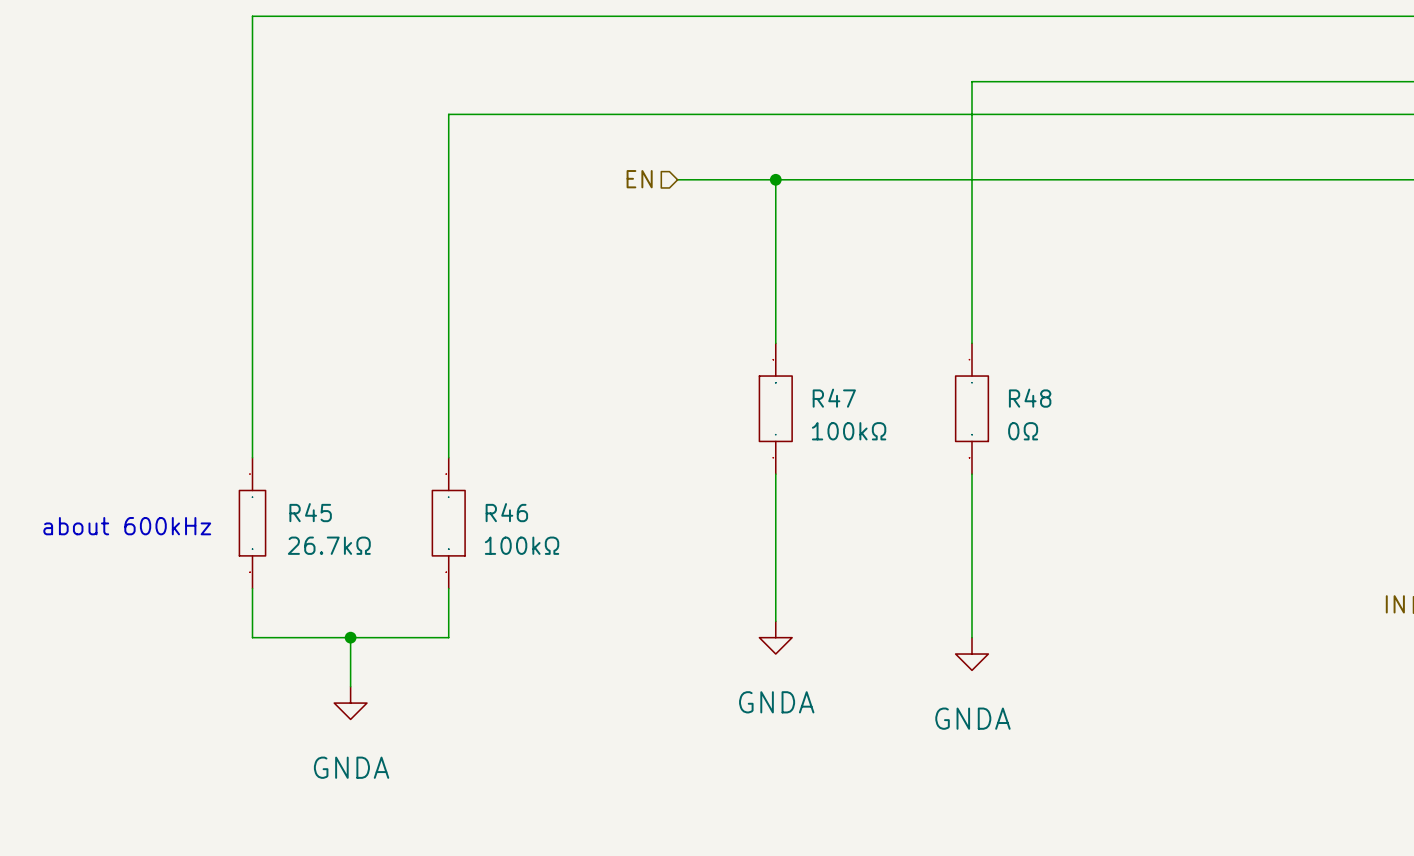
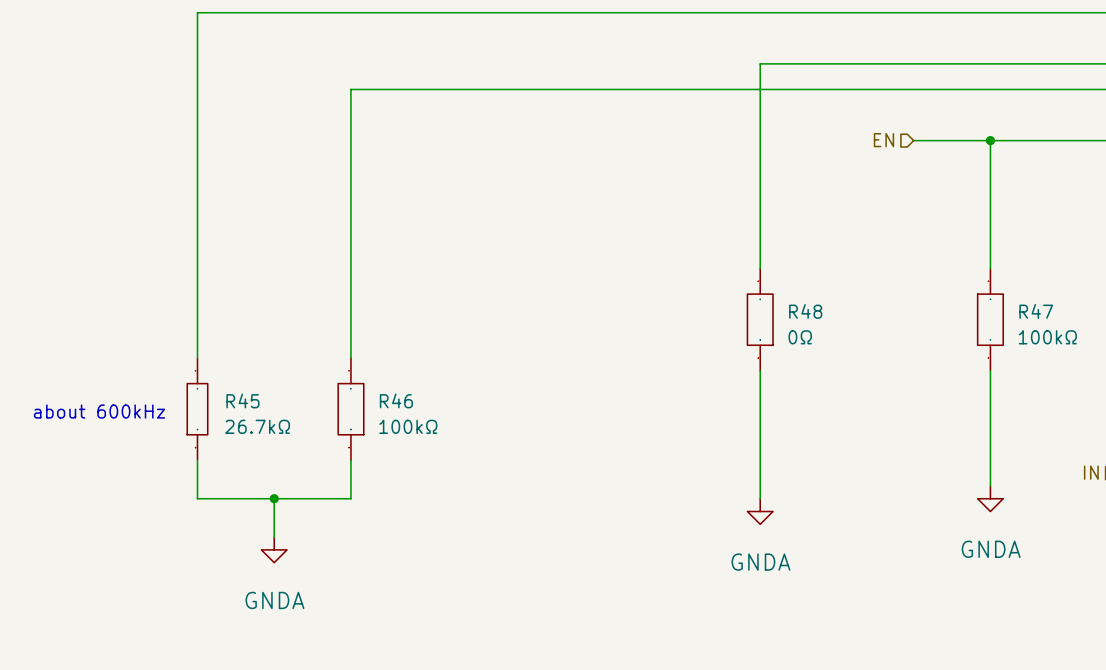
hierarchical label: EN (639, 179) -> none
wire: (677, 179) (1168, 179) -> none
wire: (775, 179) (775, 343) -> none
junction: (775, 179) -> none
hierarchical label: none -> EN (883, 140)
wire: none -> (990, 140) (990, 268)
junction: none -> (990, 140)
R47 position: (775, 408) -> (990, 319)
wire: (775, 474) (775, 621) -> none
wire: none -> (990, 370) (990, 485)
power symbol: GNDA (775, 637) -> none
power symbol: none -> GNDA (990, 498)

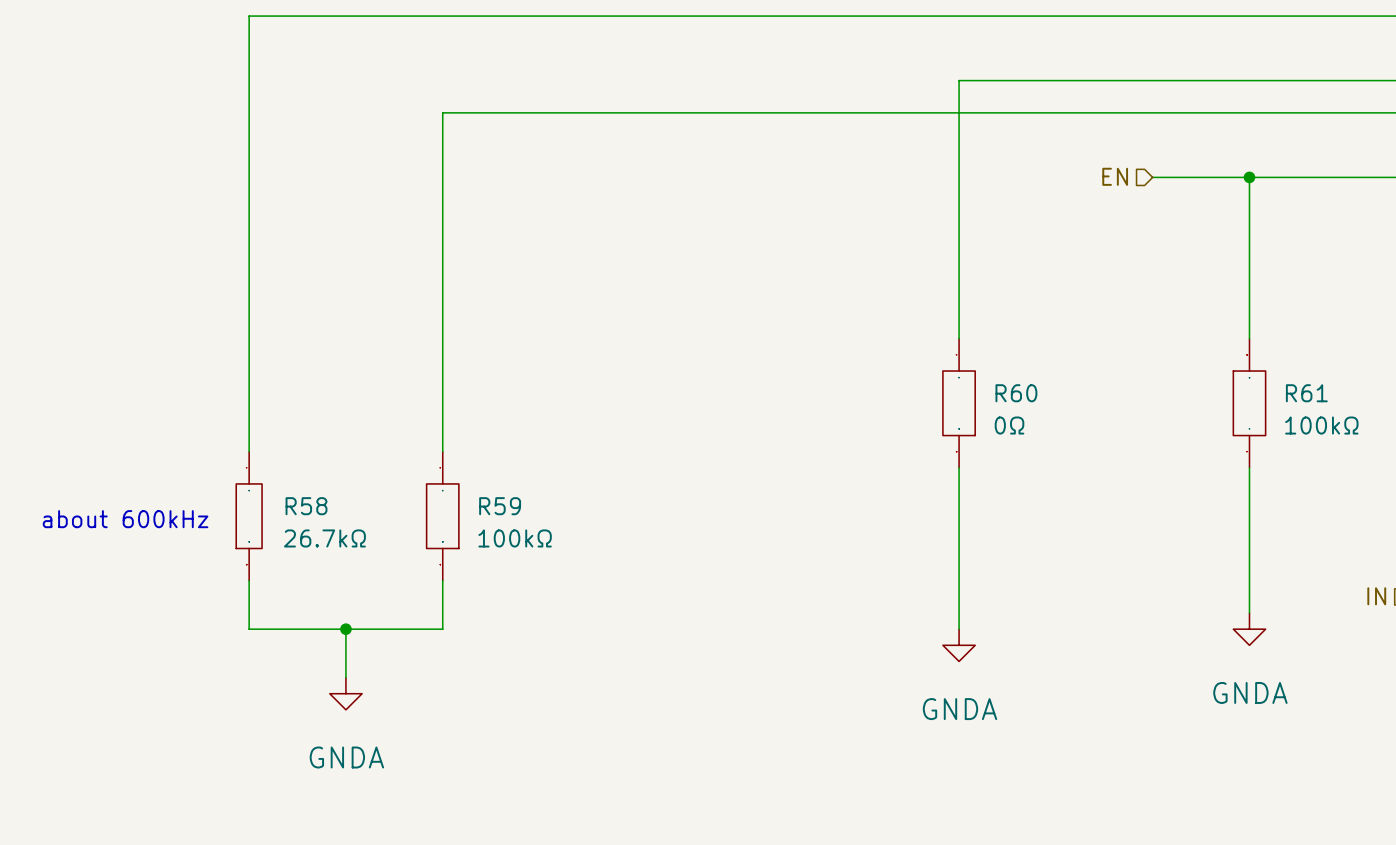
R48 name: R48 (805, 311) -> R60 (1016, 393)
R47 name: R47 (1036, 311) -> R61 (1306, 393)
R45 name: R45 (242, 400) -> R58 (306, 506)
R46 name: R46 (396, 400) -> R59 (500, 506)

